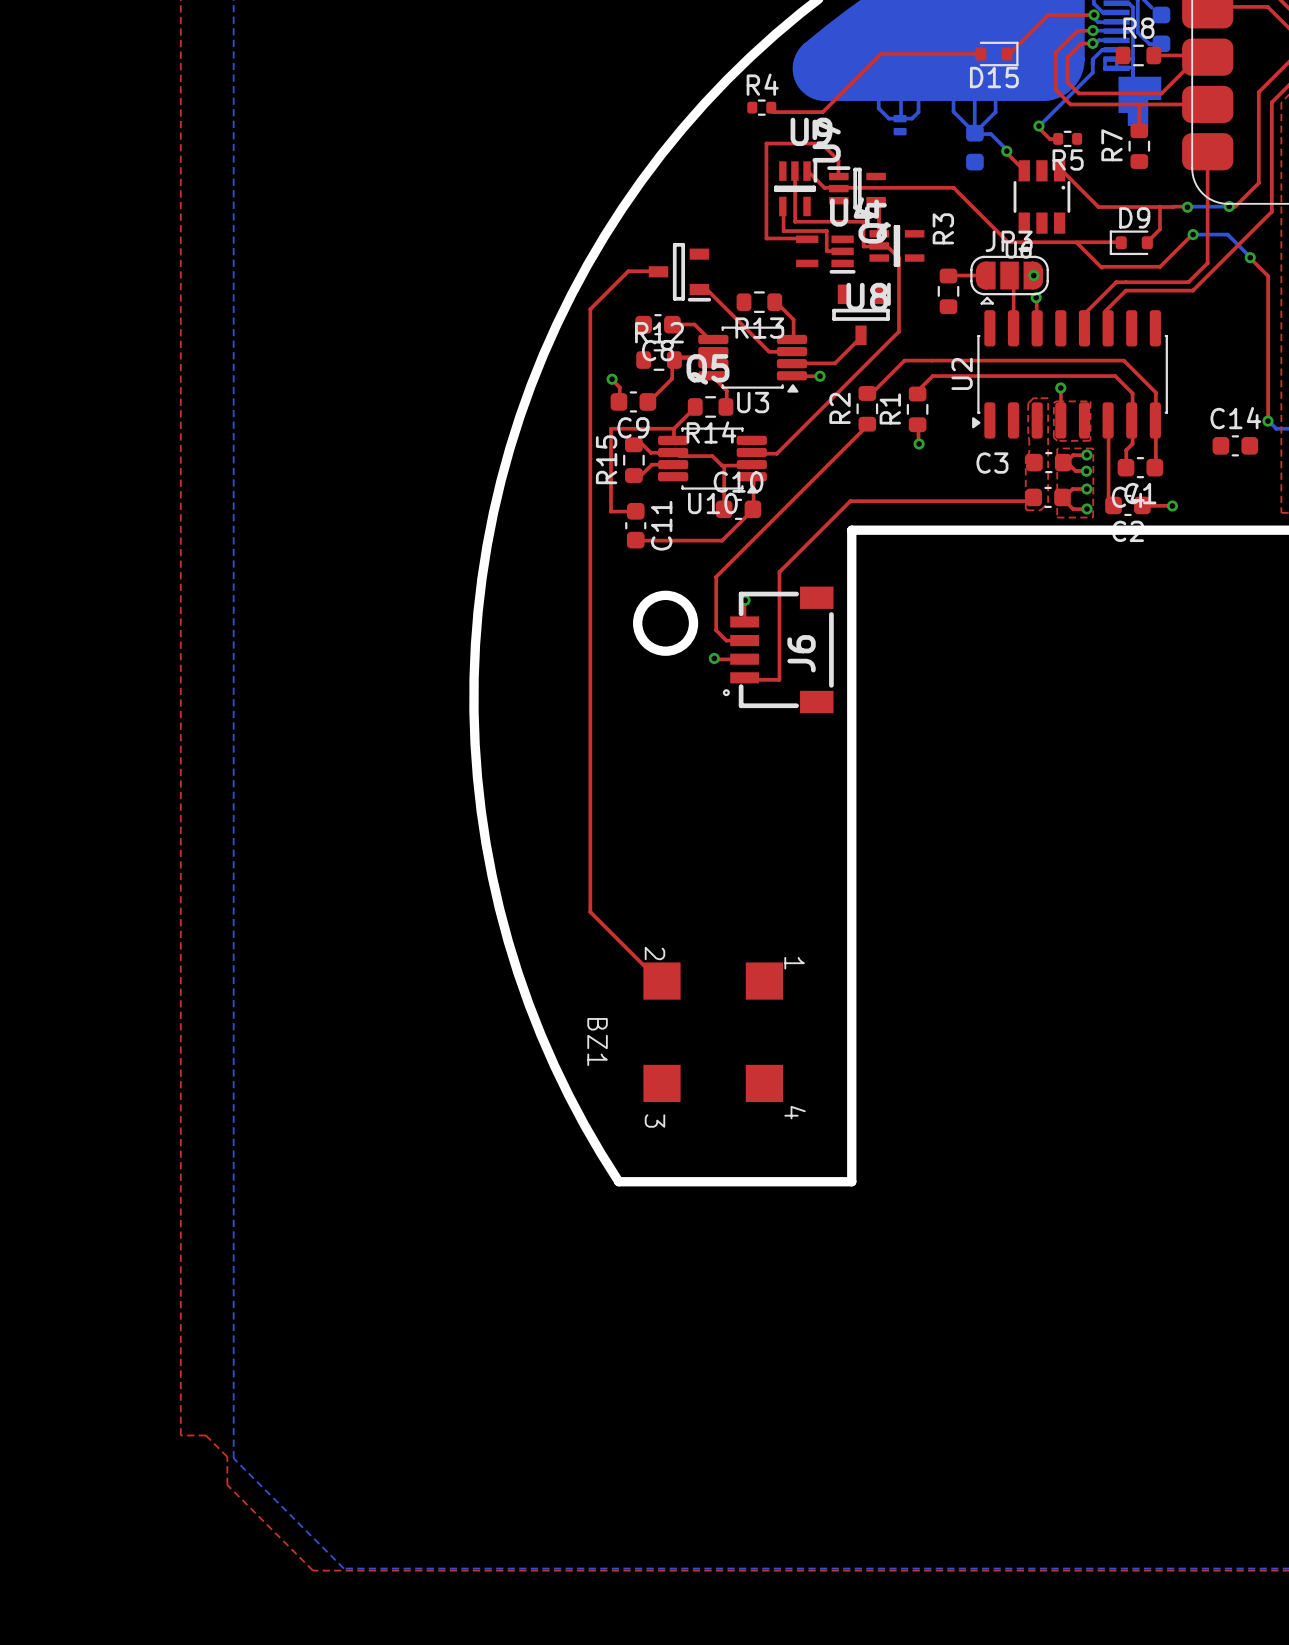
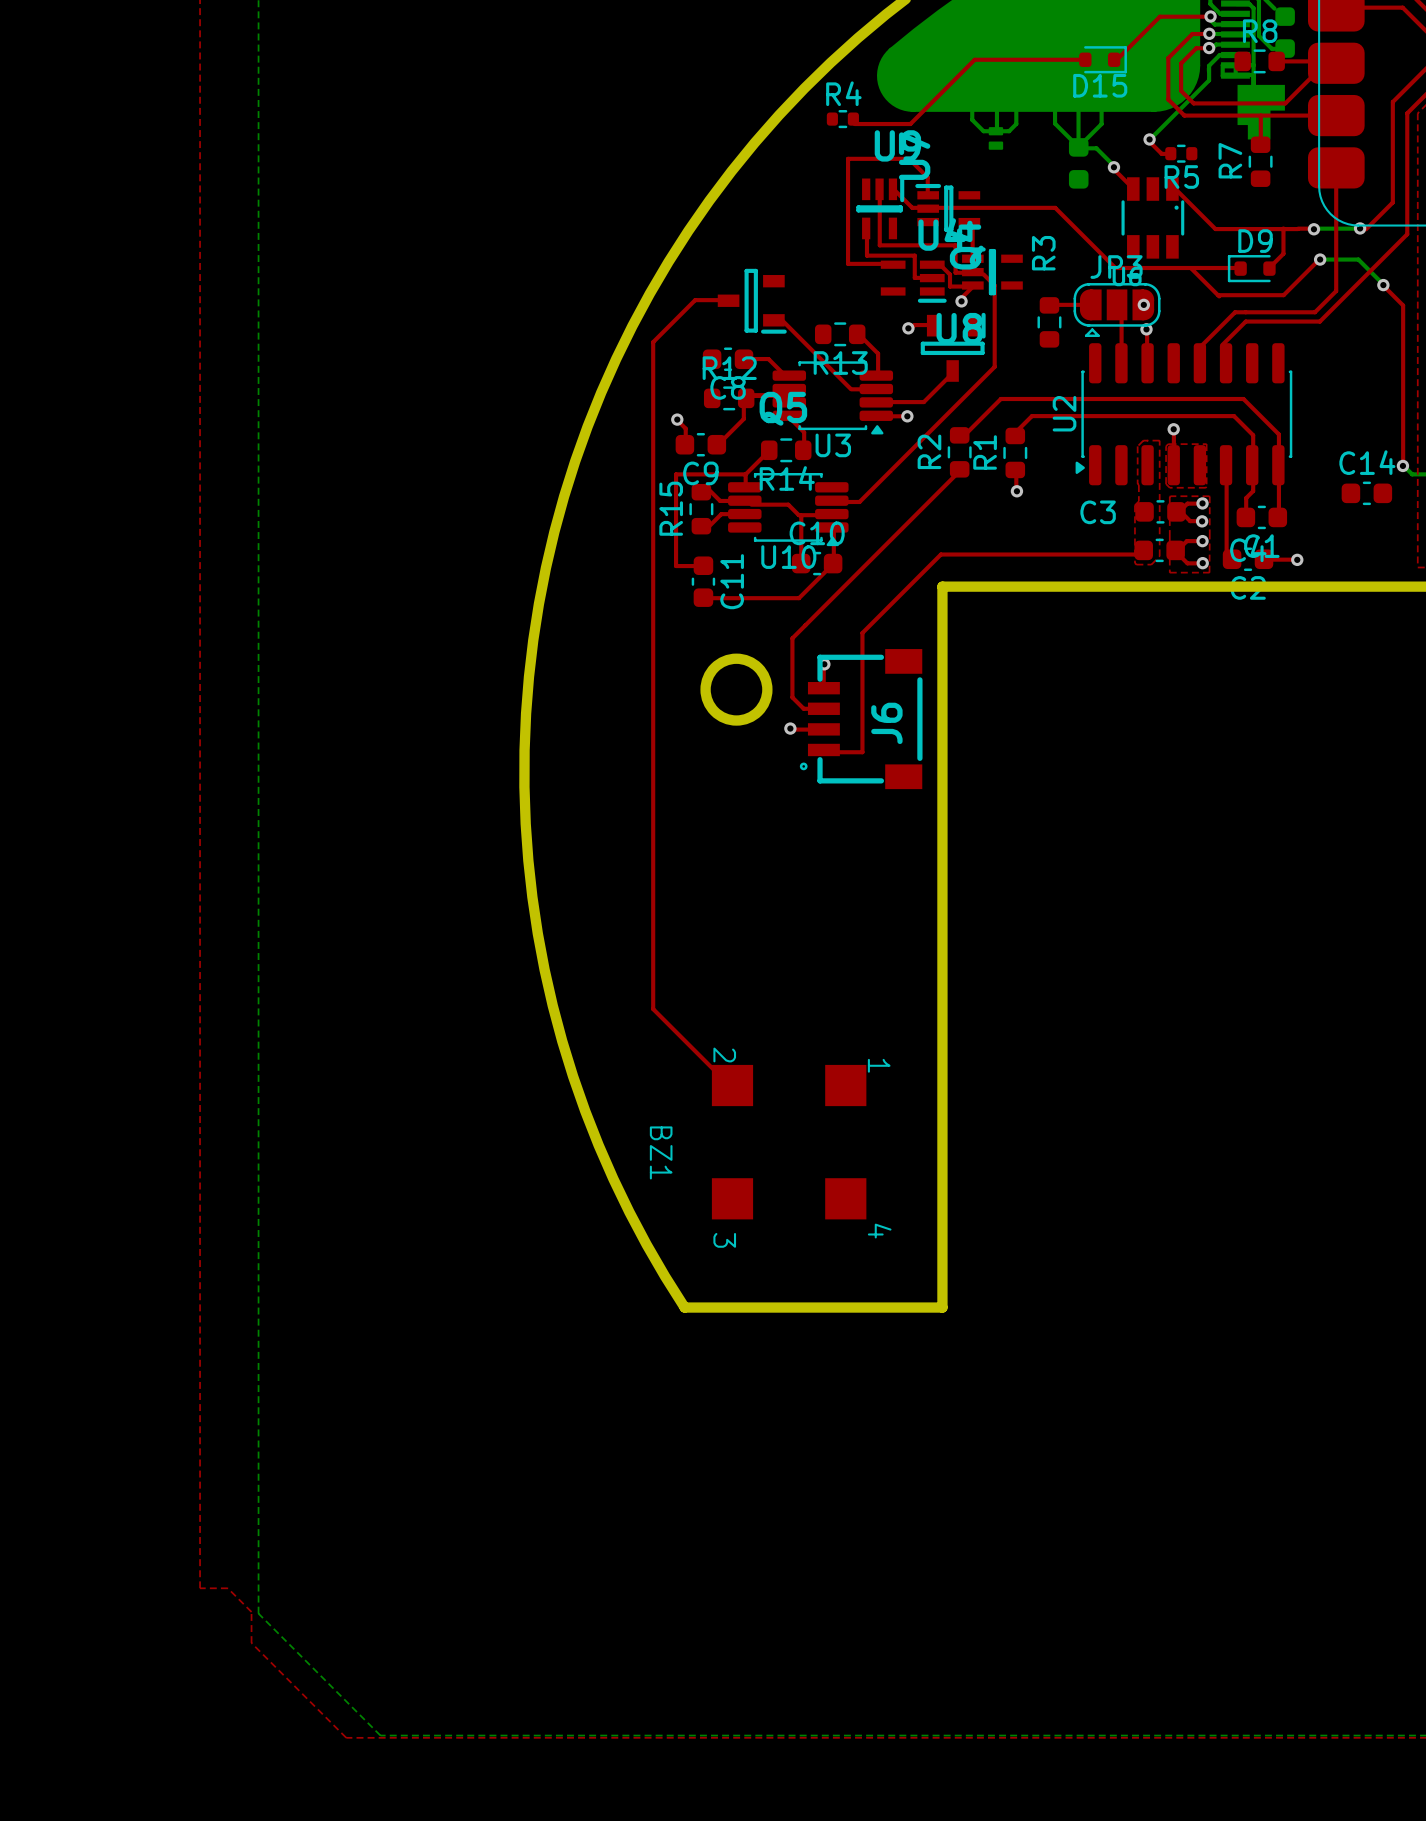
top track: none -> (938, 262) (950, 274) (950, 286) (973, 286) (959, 299)
via: none -> (961, 301)
top track: none -> (933, 325) (914, 325) (908, 331)
via: none -> (908, 328)

